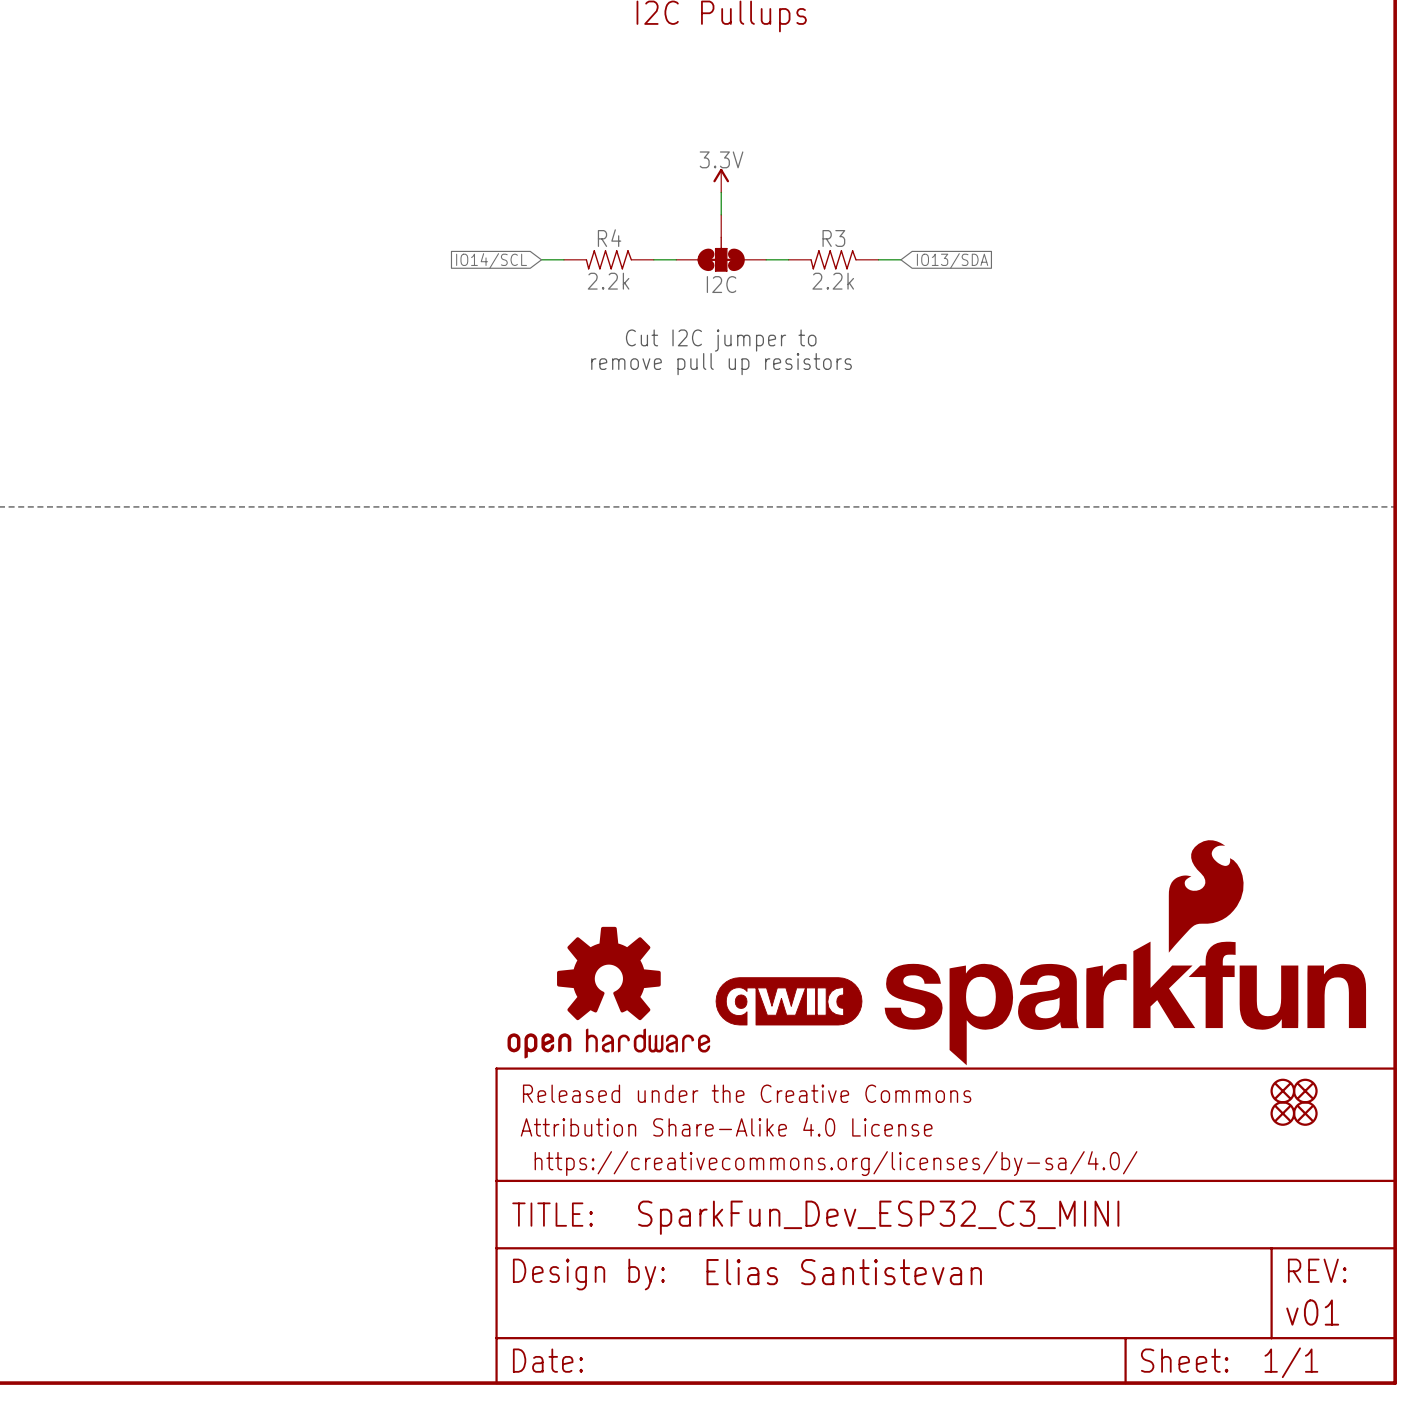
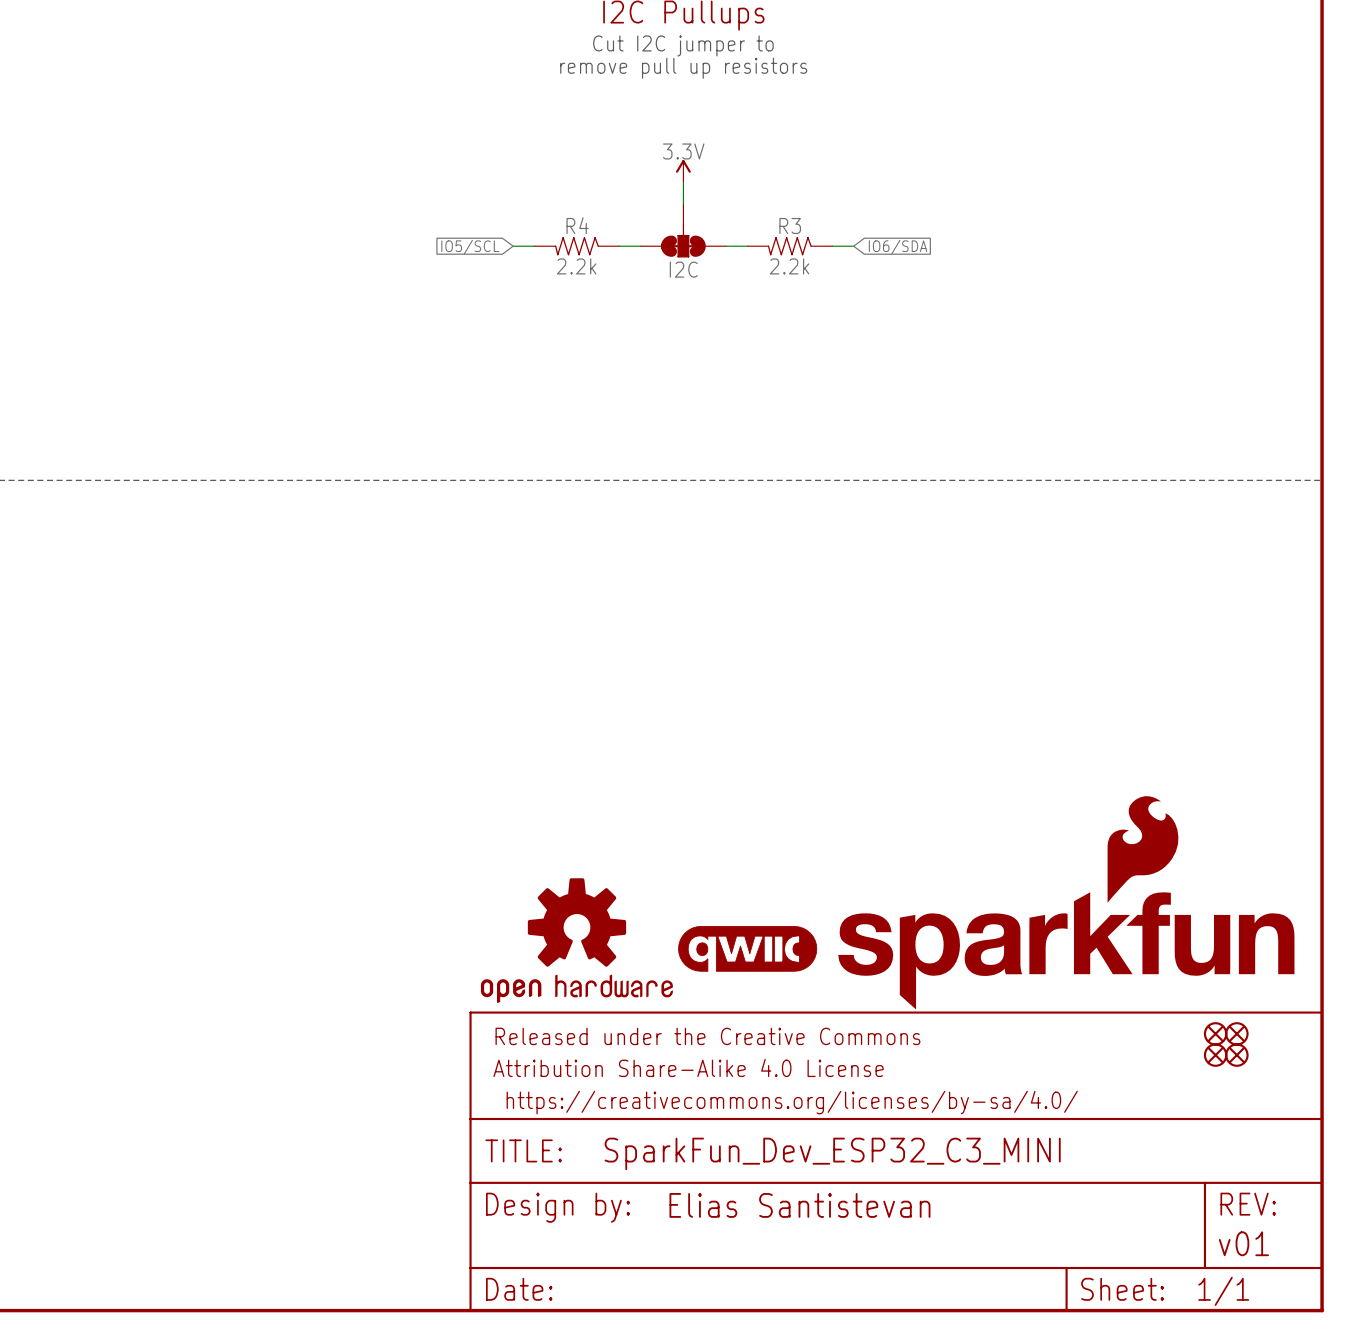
text: none -> Cut I2C jumper to (683, 45)
text: none -> remove pull up resistors (683, 68)
global label: IO14/SCL (491, 260) -> IO5/SCL (470, 247)
global label: IO13/SDA (952, 260) -> IO6/SDA (898, 247)
text: Cut I2C jumper to (721, 340) -> none
text: remove pull up resistors (721, 364) -> none

